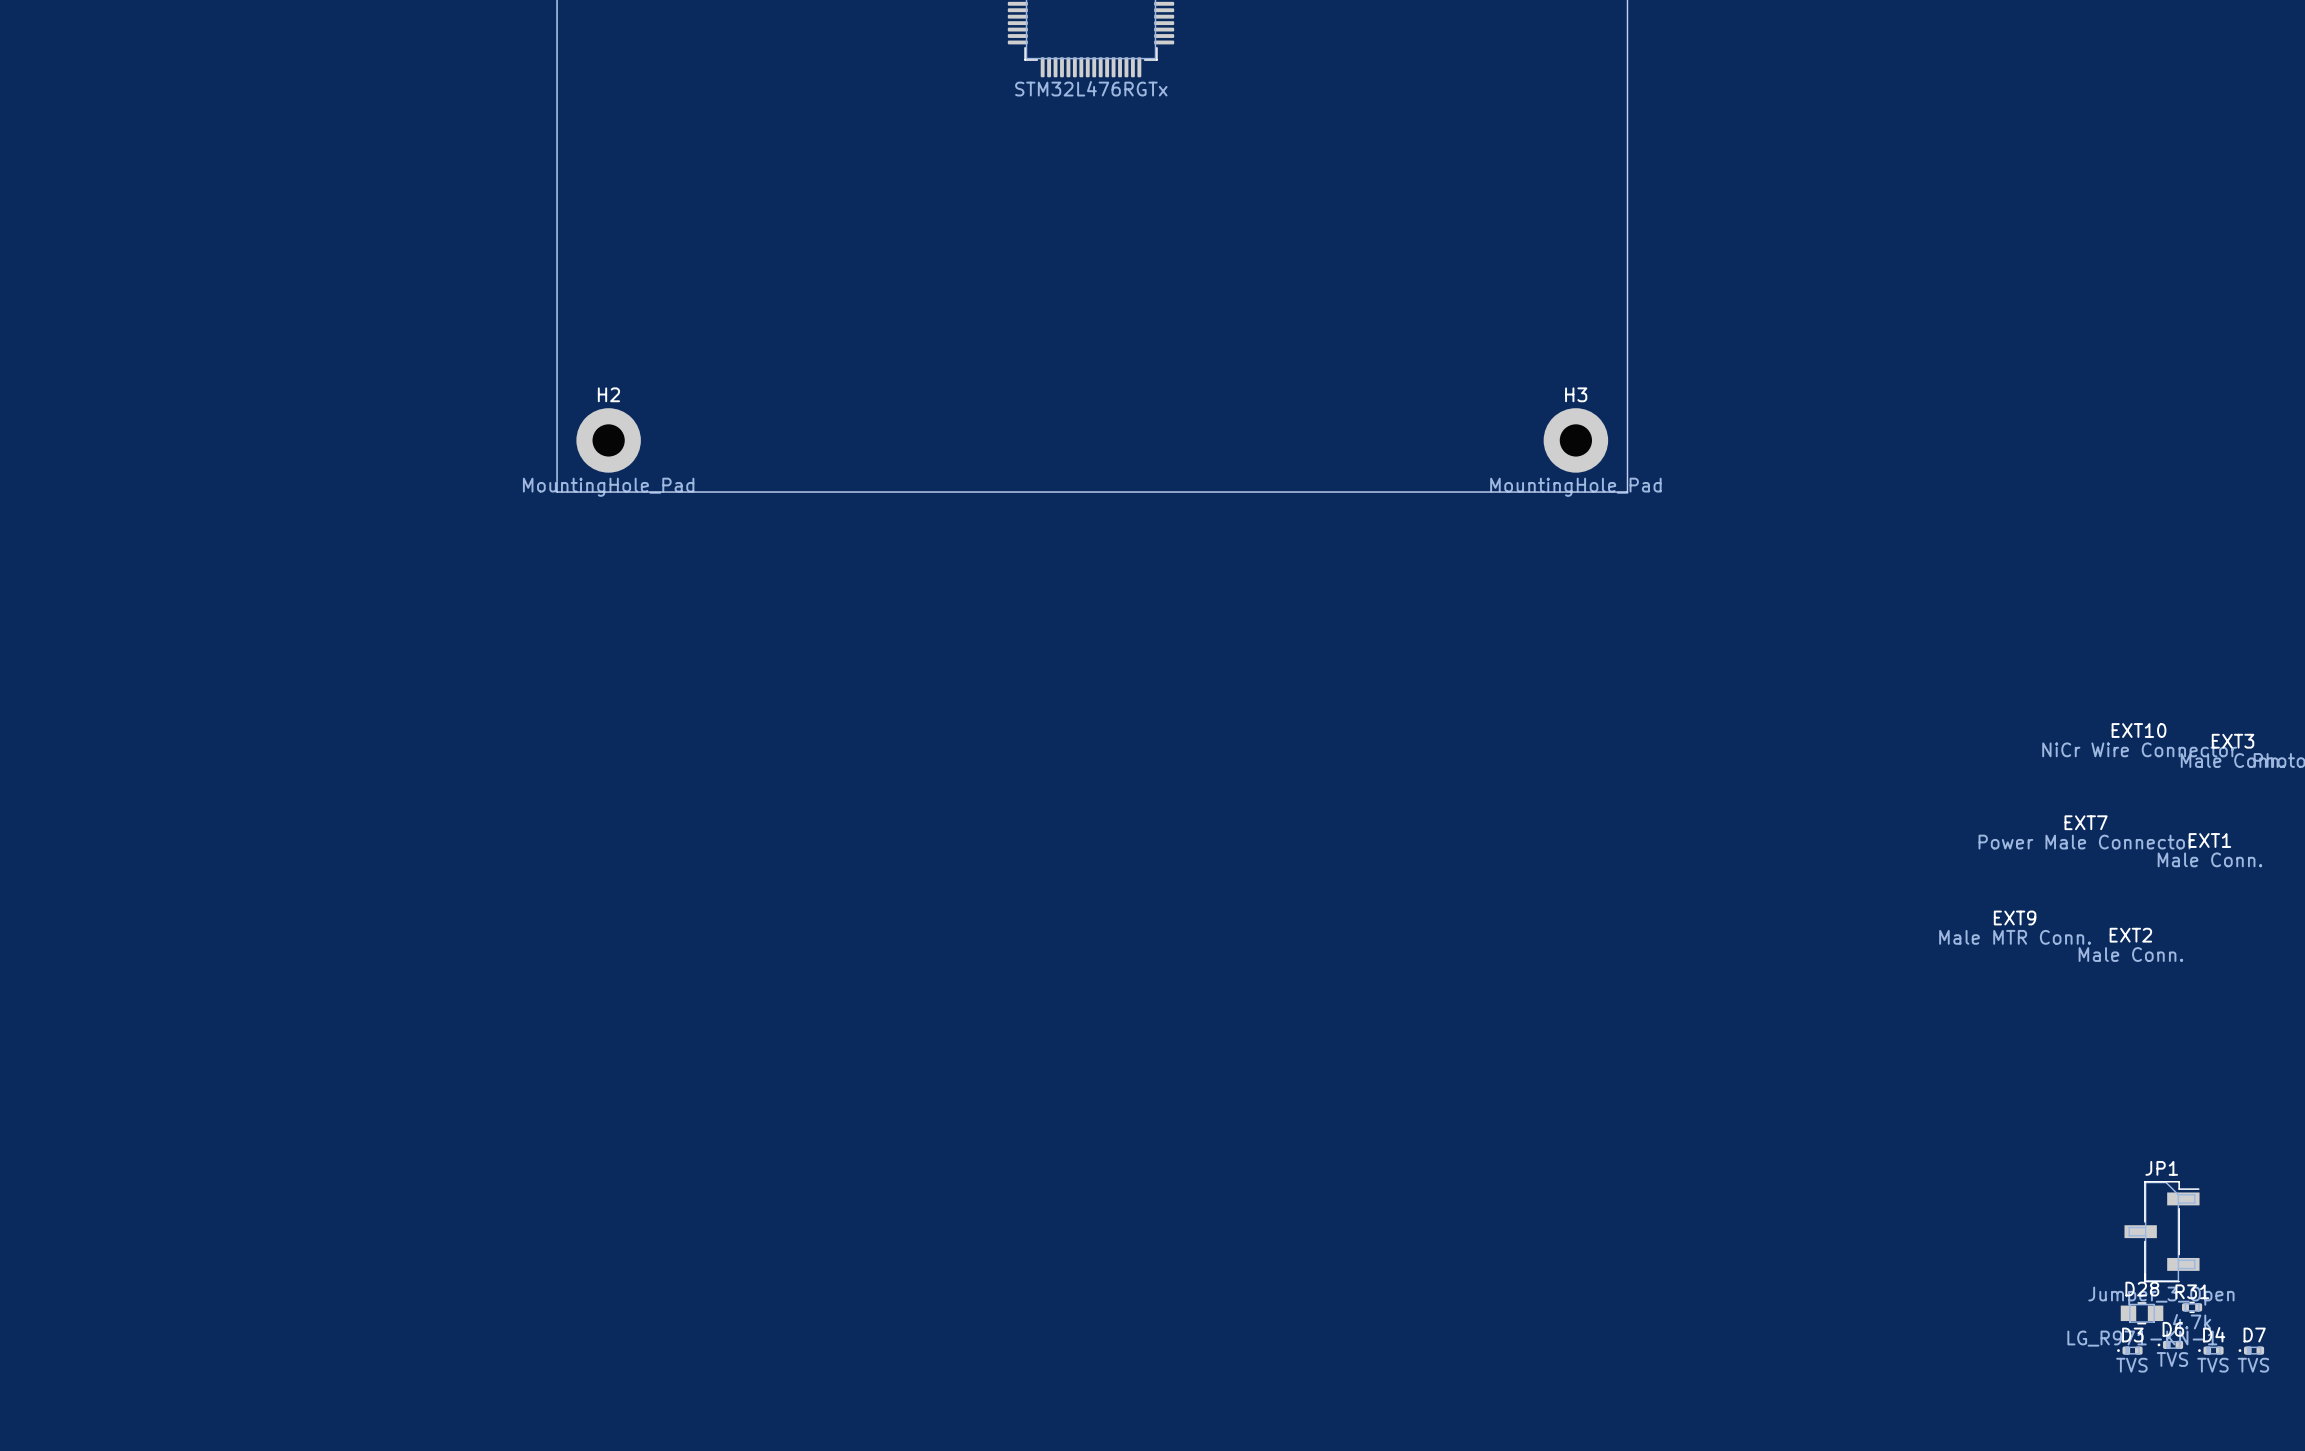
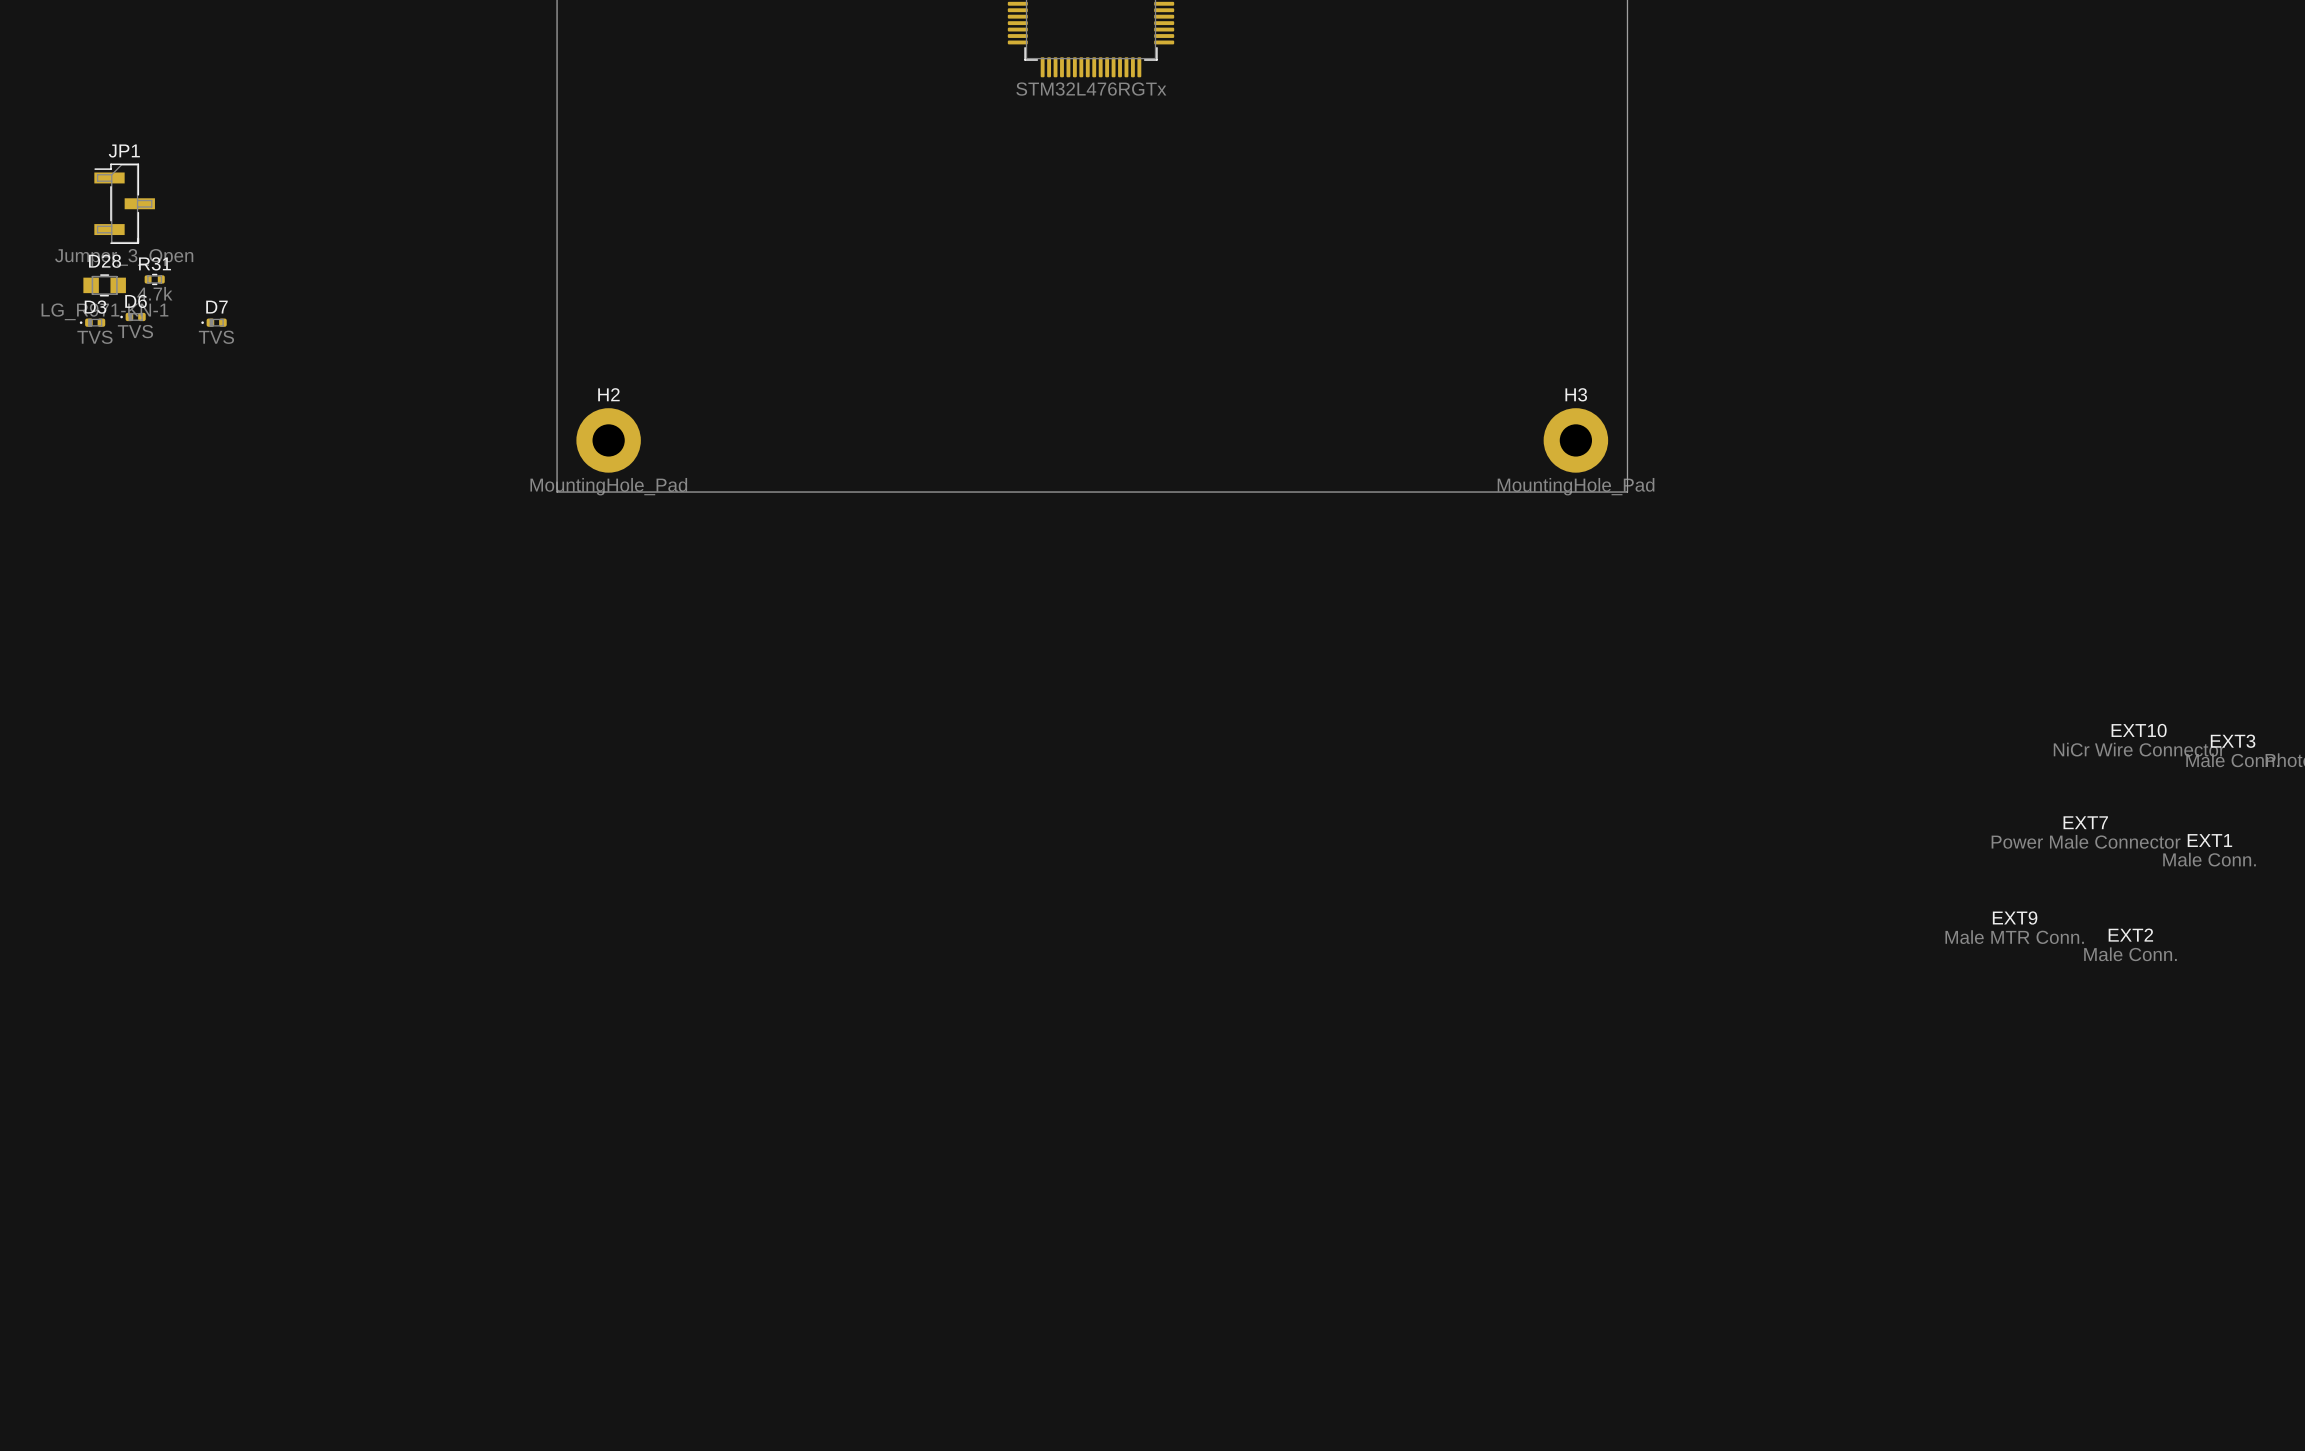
JP1 footprint: [2124, 1180, 2200, 1283] -> [94, 163, 155, 244]
R31 position: (2192, 1307) -> (154, 279)
D28 position: (2142, 1313) -> (104, 285)
D6 position: (2170, 1344) -> (133, 316)
D3 position: (2129, 1350) -> (92, 322)
D4: TVS (2210, 1350) -> none
D7 position: (2251, 1350) -> (214, 322)

